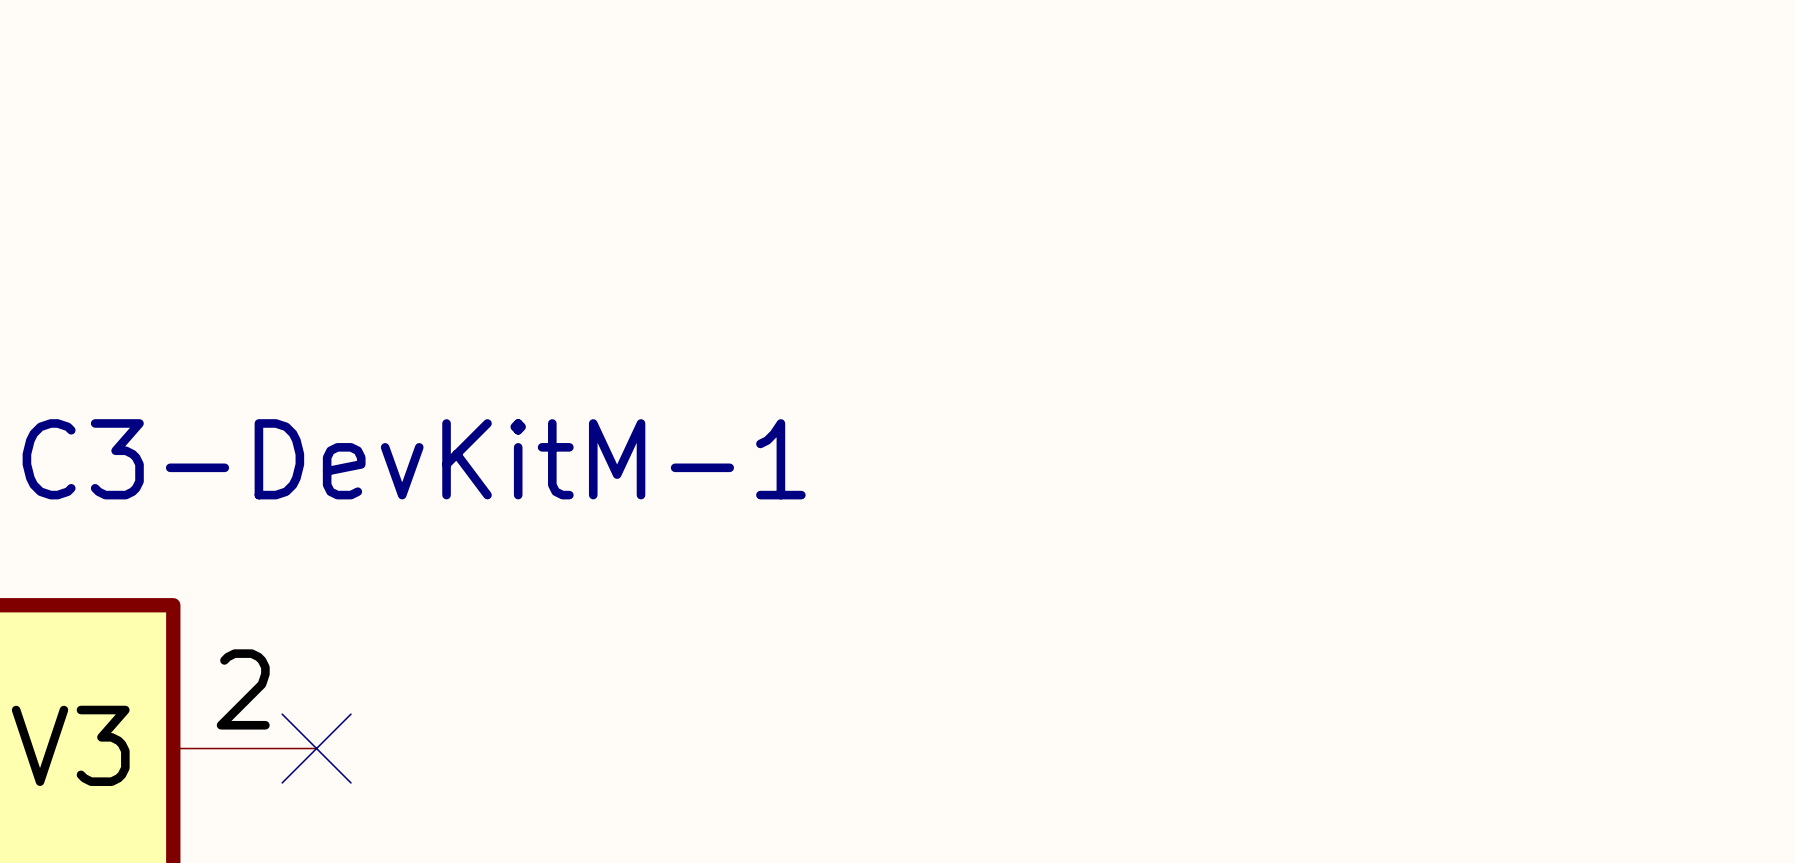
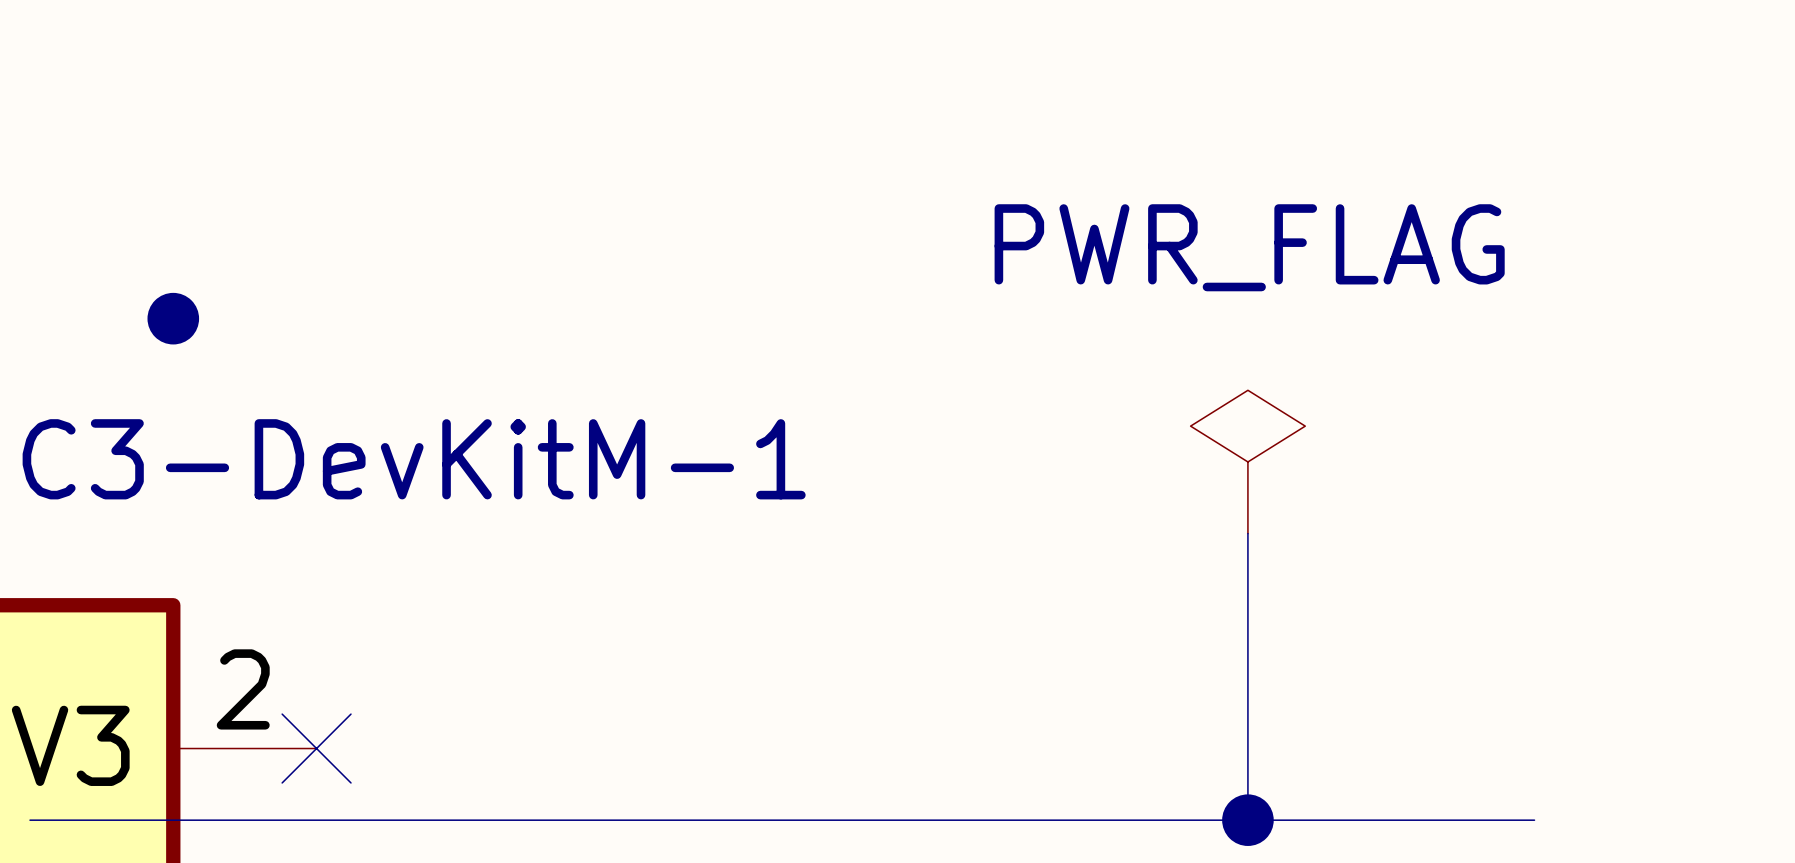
junction: none -> (173, 318)
power symbol: none -> PWR_FLAG (1247, 461)
wire: none -> (1247, 533) (1247, 820)
wire: none -> (30, 820) (1534, 820)
junction: none -> (1247, 820)

